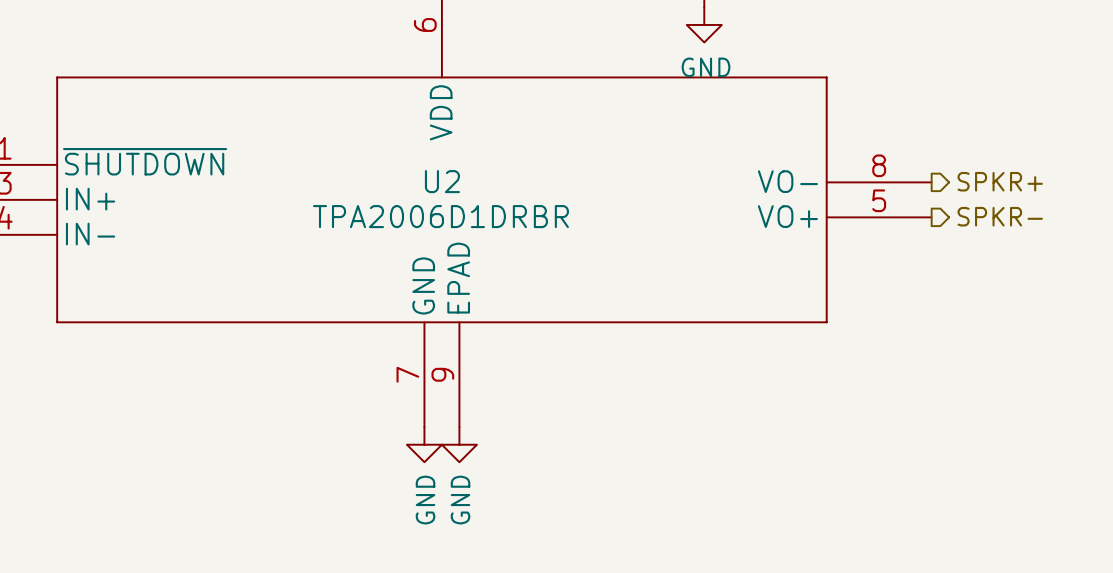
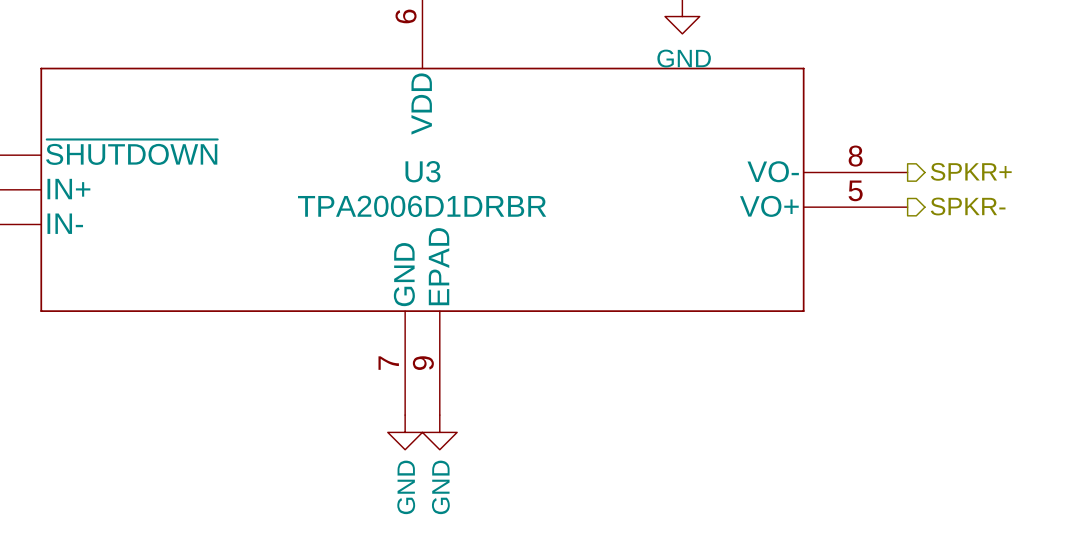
U2 name: U2 (442, 181) -> U3 (422, 171)

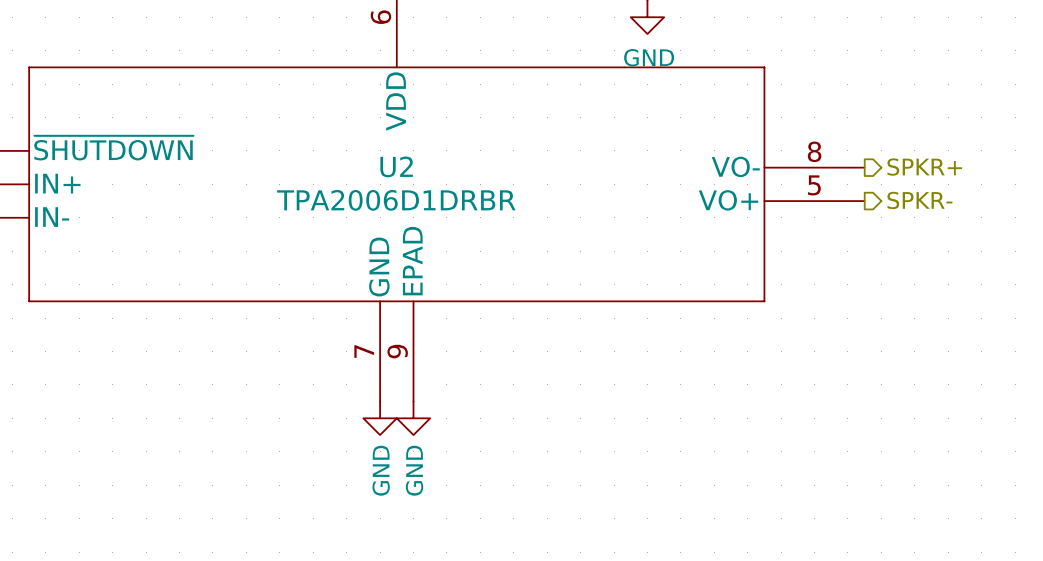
U3 name: U3 (422, 171) -> U2 (396, 166)

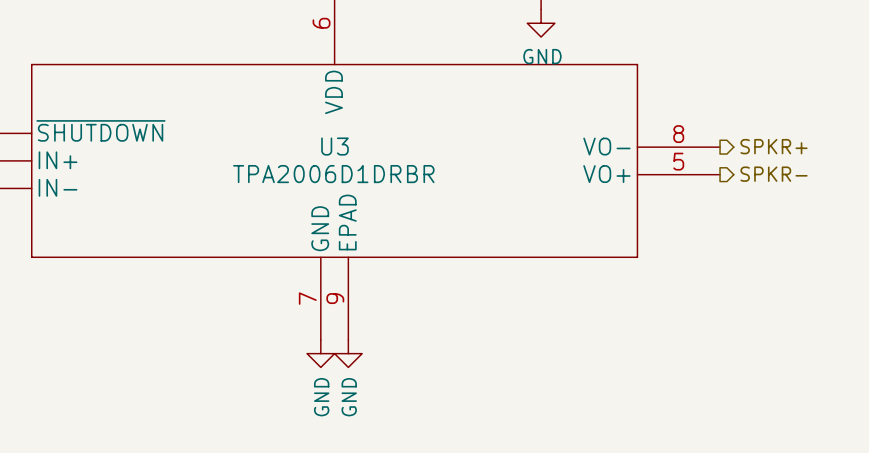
U2 name: U2 (396, 166) -> U3 (334, 146)

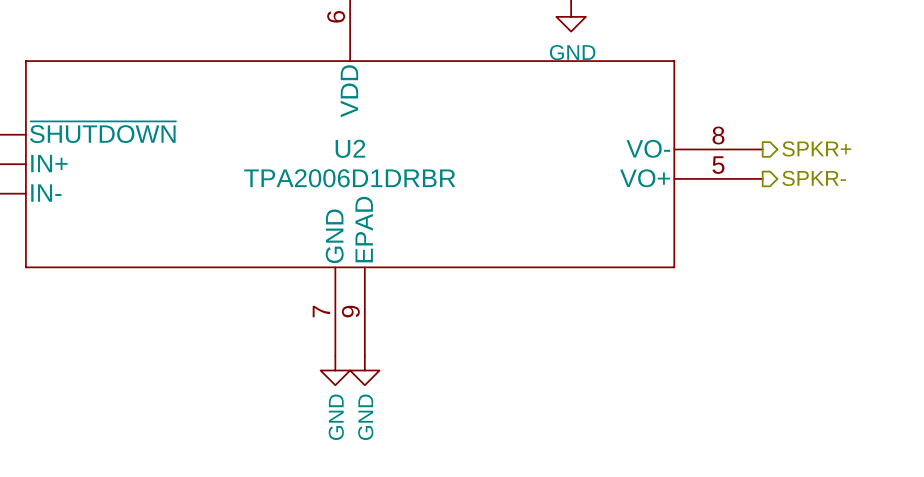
U3 name: U3 (334, 146) -> U2 (350, 148)

